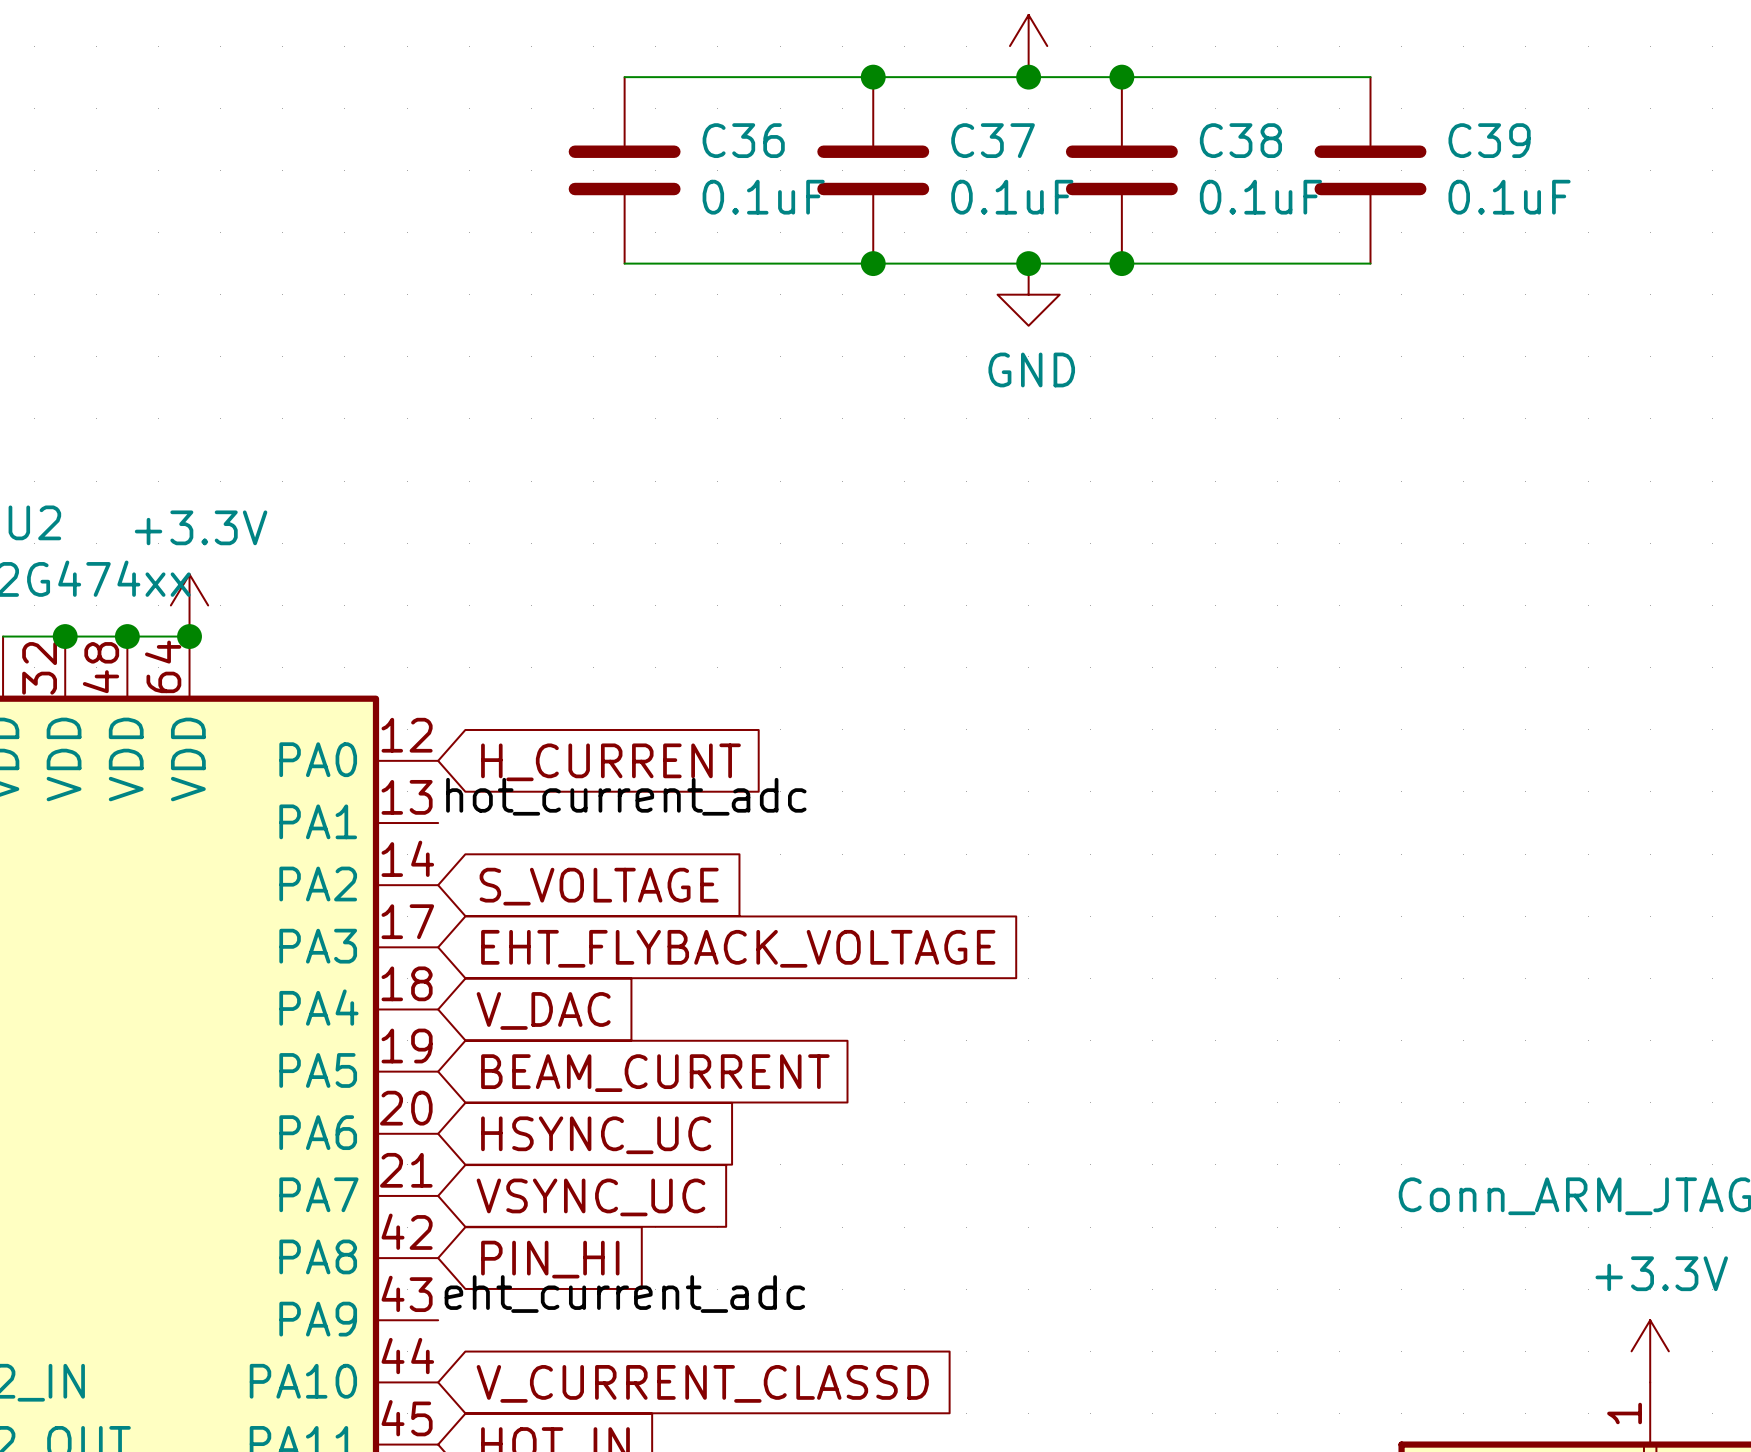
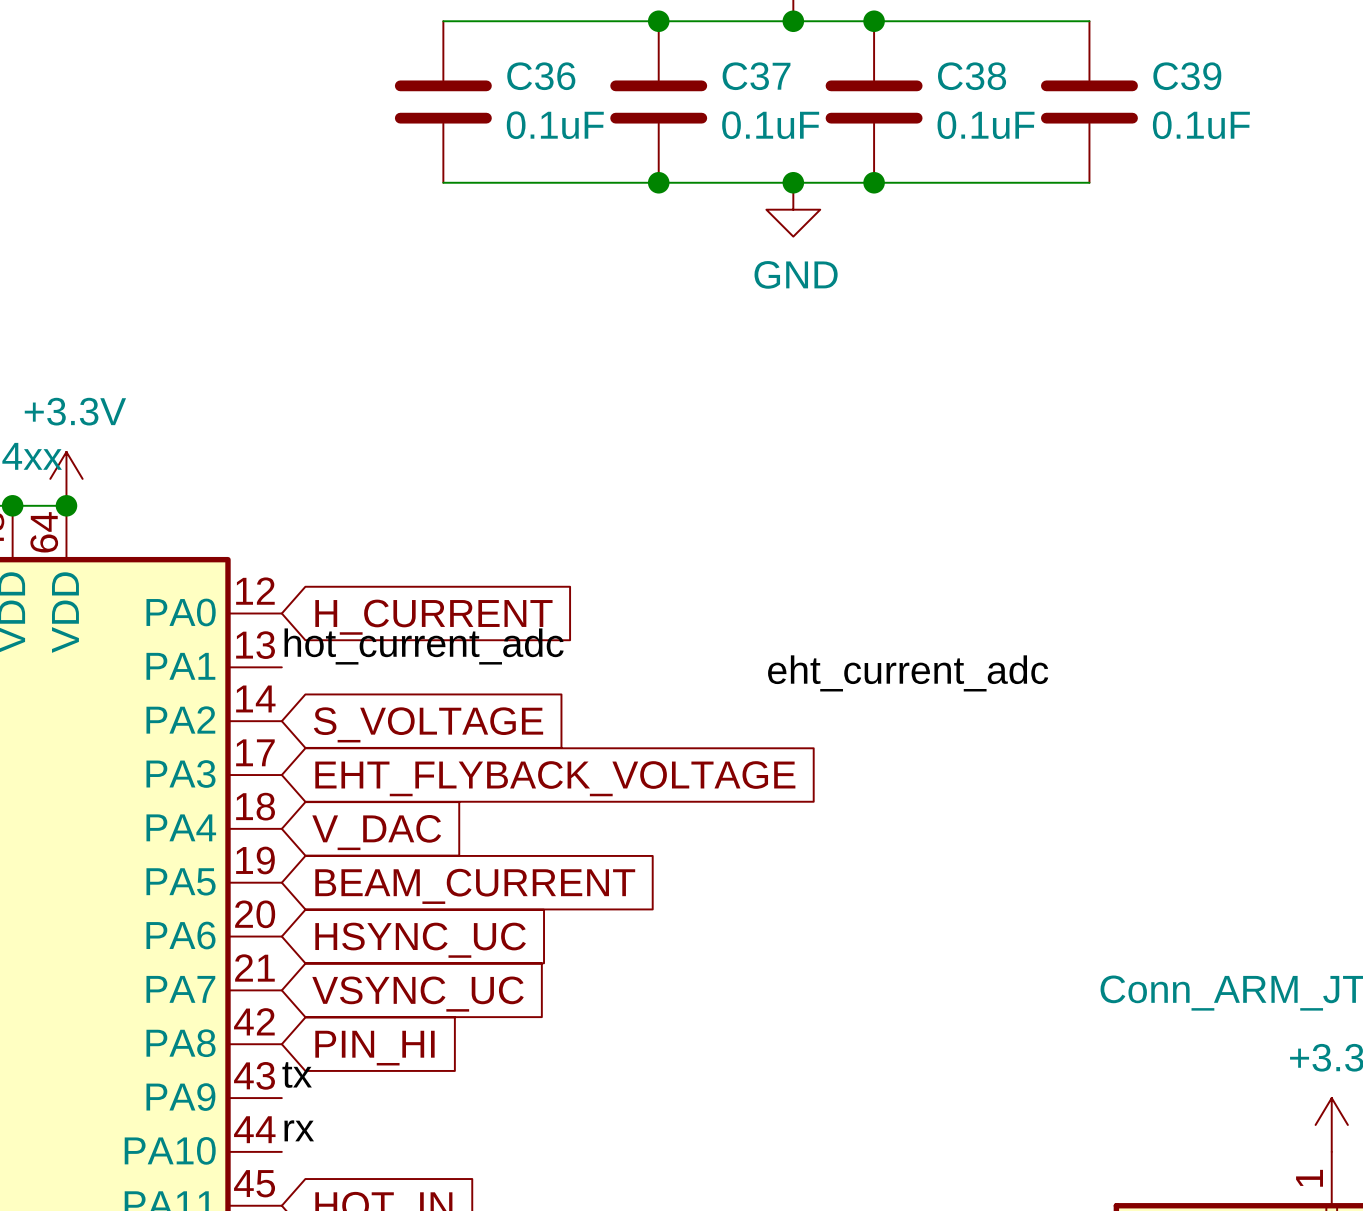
label: none -> eht_current_adc (908, 673)
label: eht_current_adc (624, 1294) -> tx (297, 1075)
label: none -> rx (299, 1130)
global label: V_CURRENT_CLASSD (702, 1383) -> none

